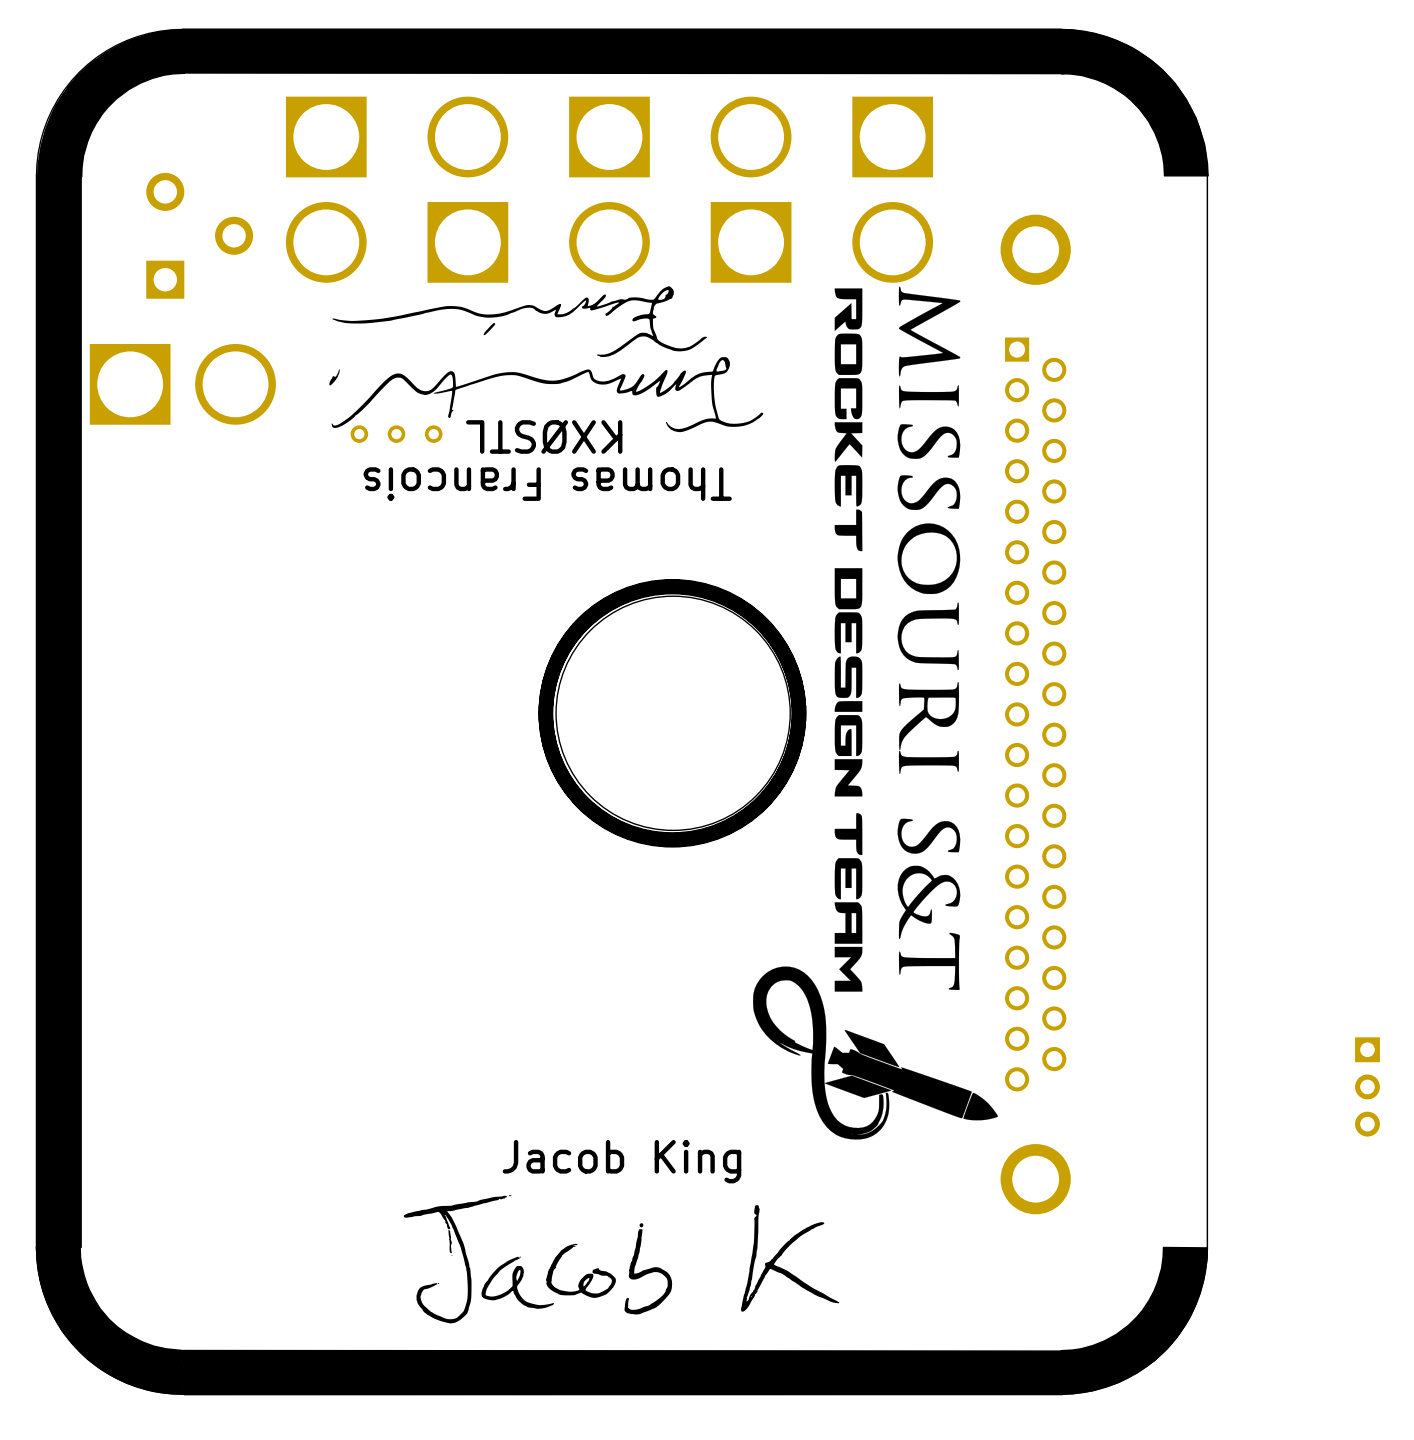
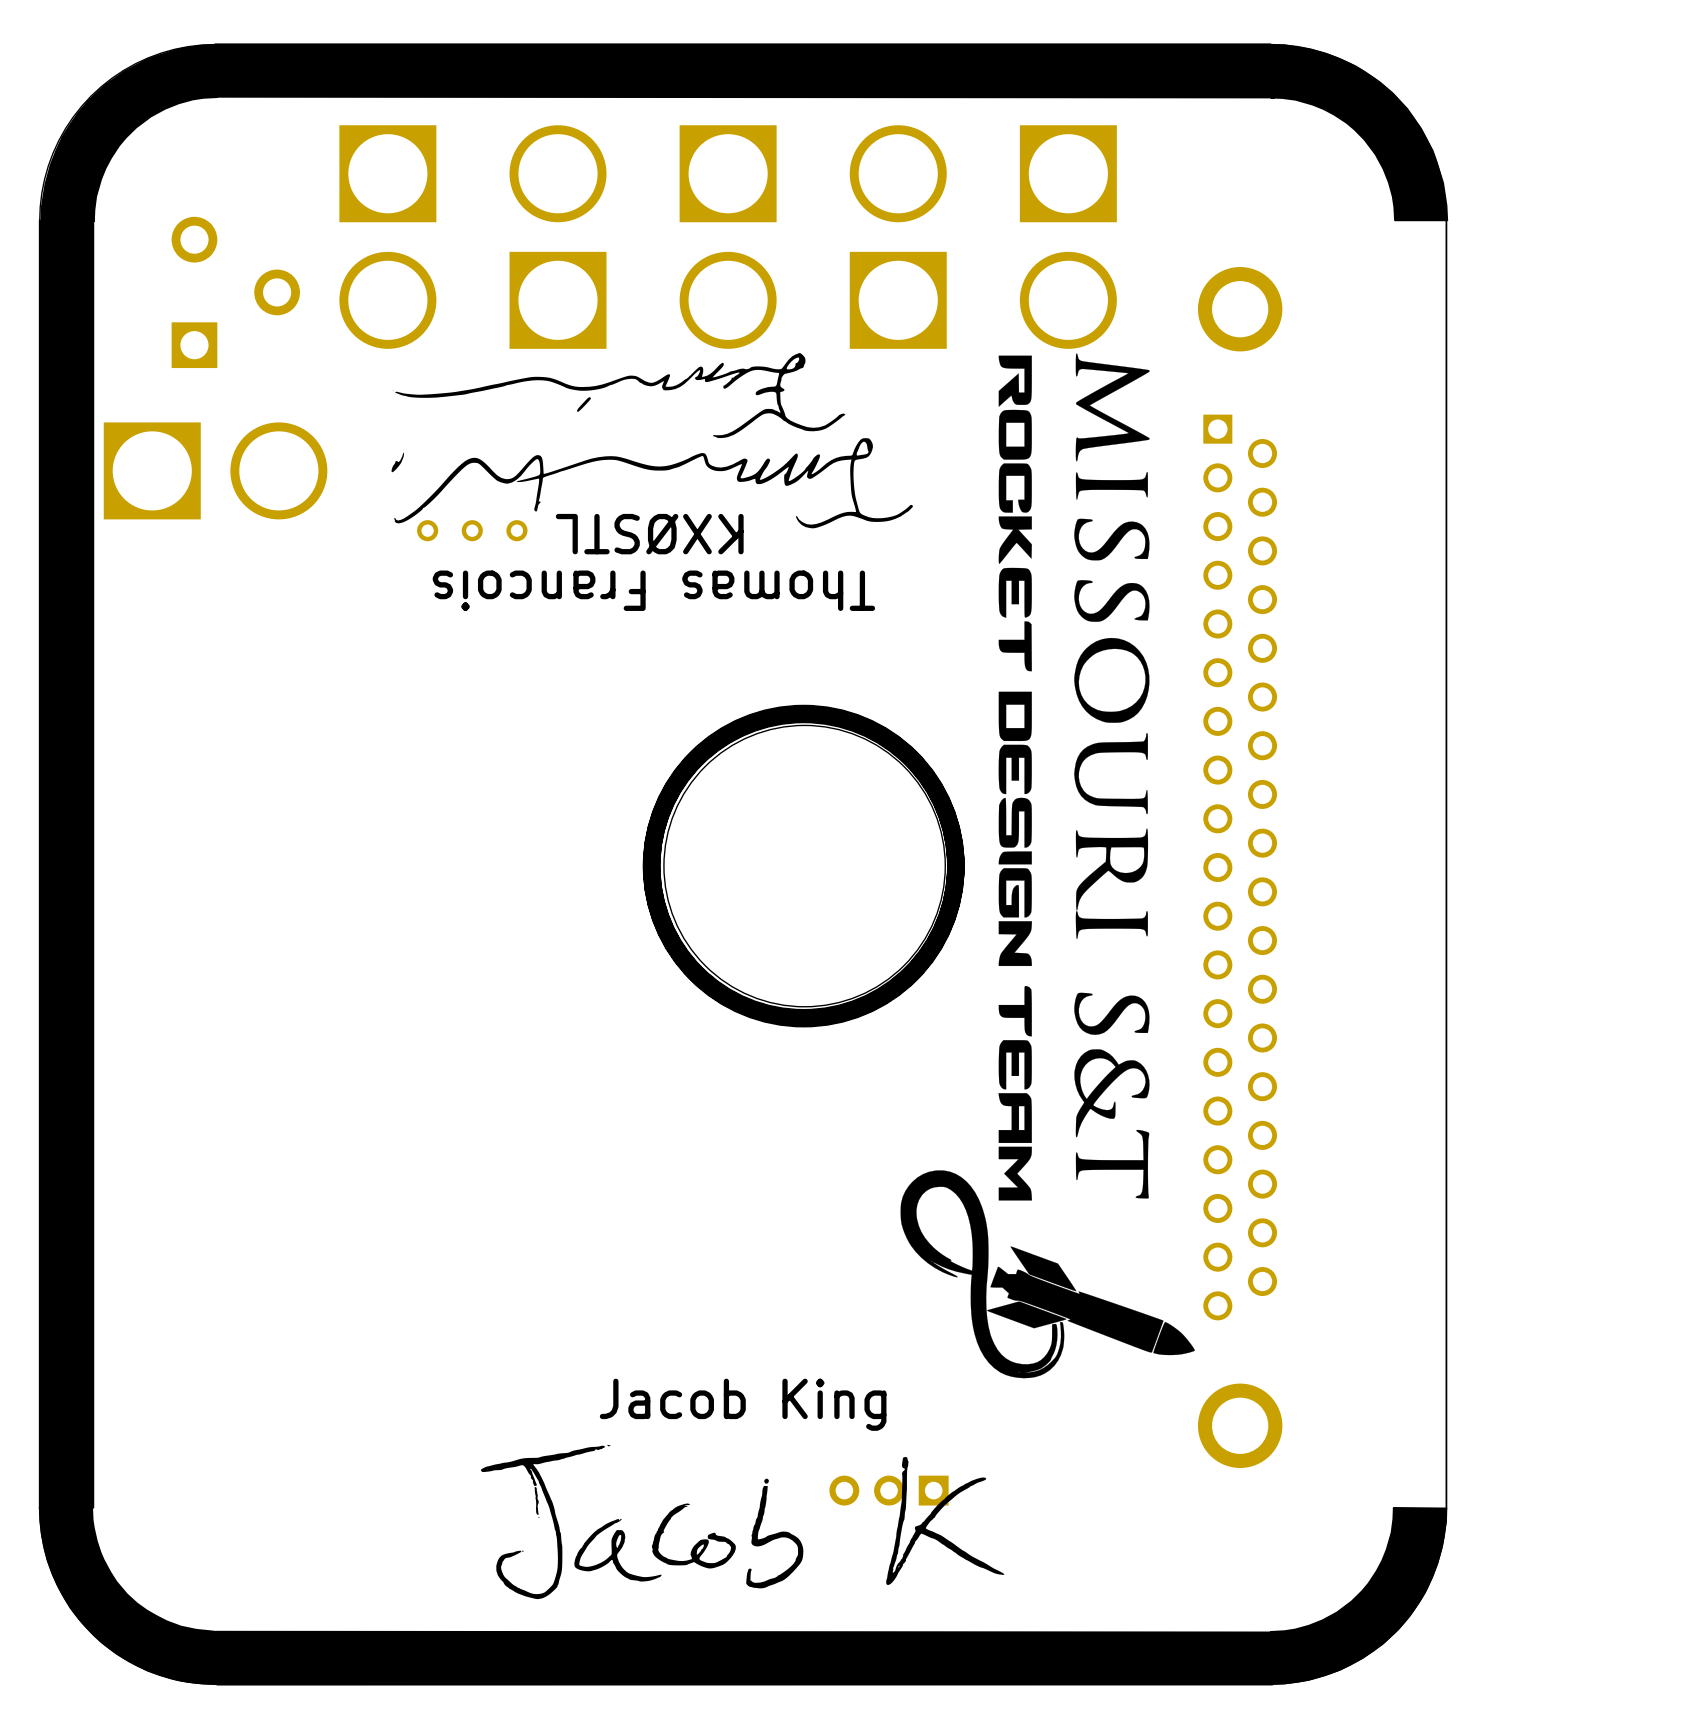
part: (1367, 1086) -> none
part: none -> (889, 1490)

